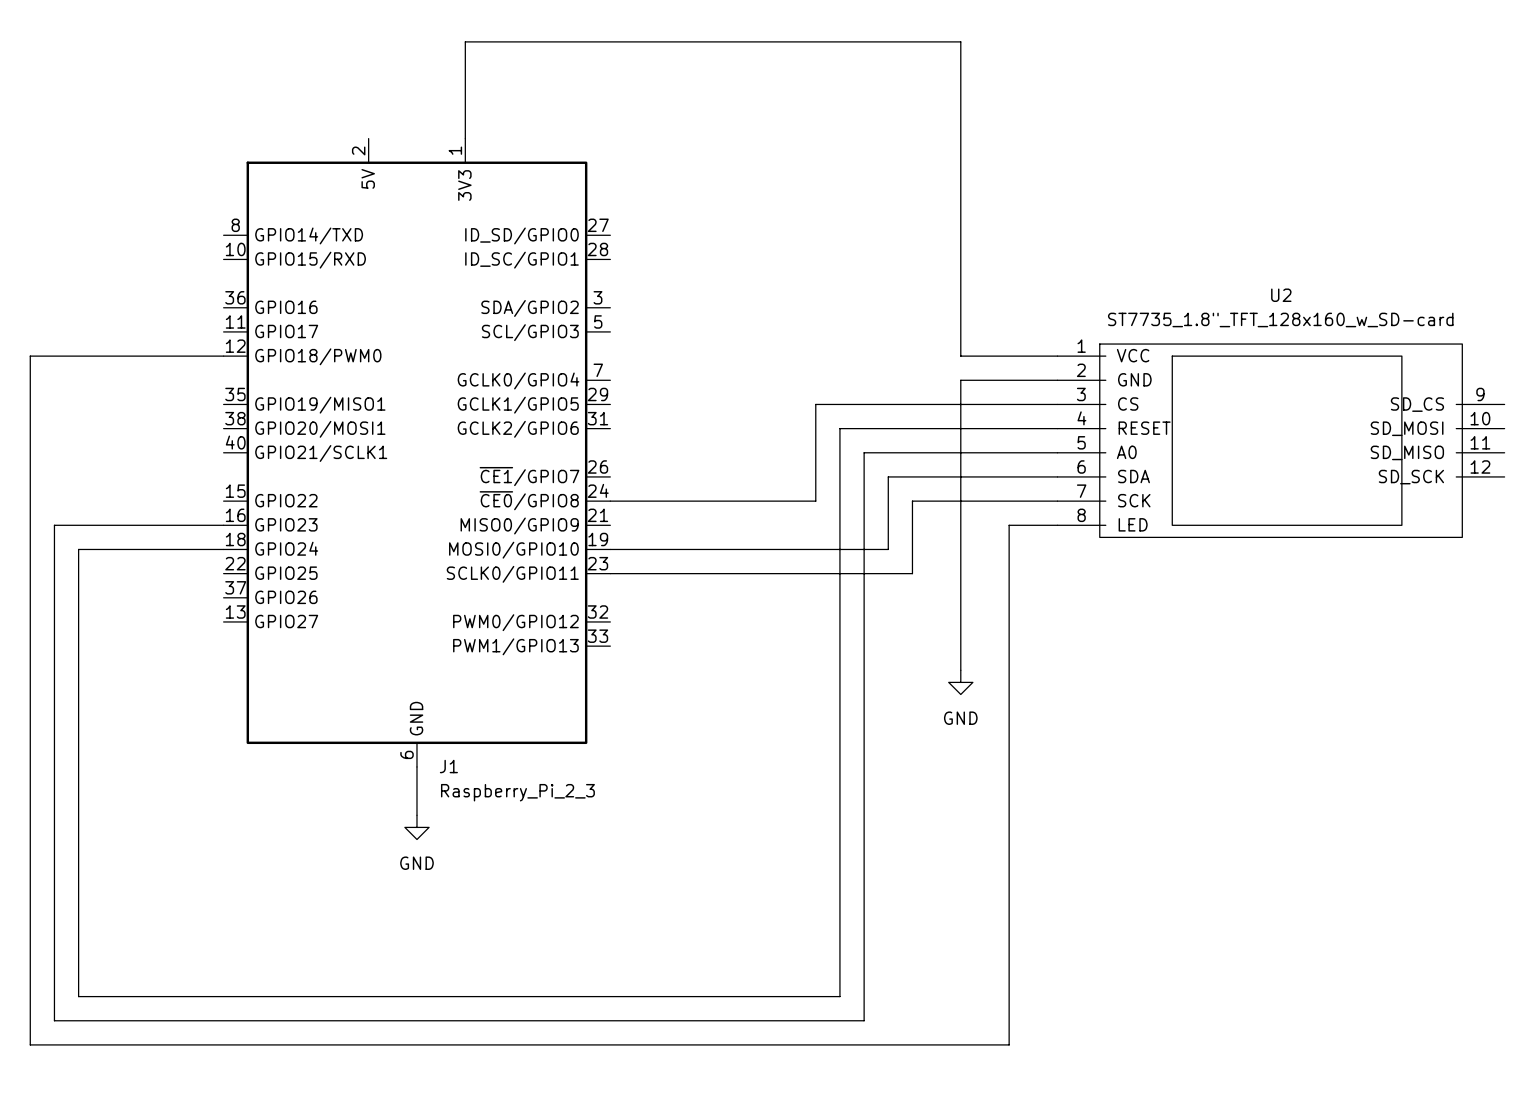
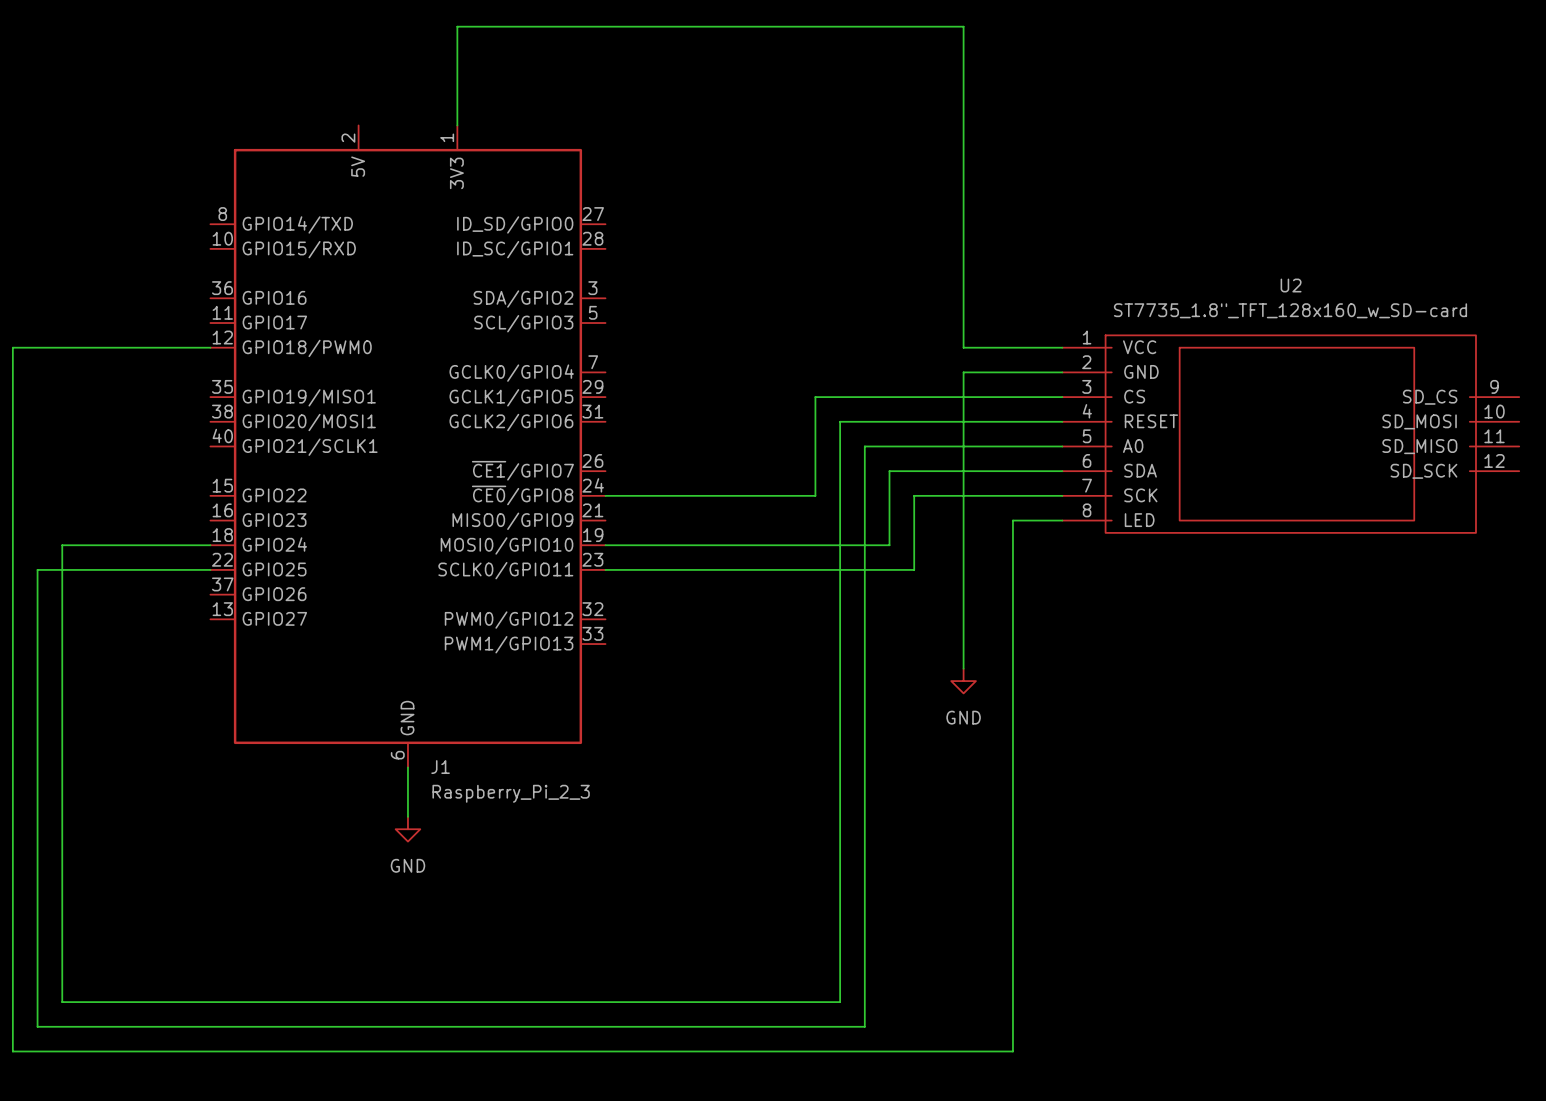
wire: (223, 525) (54, 525) (54, 573) -> (210, 569) (37, 569)

